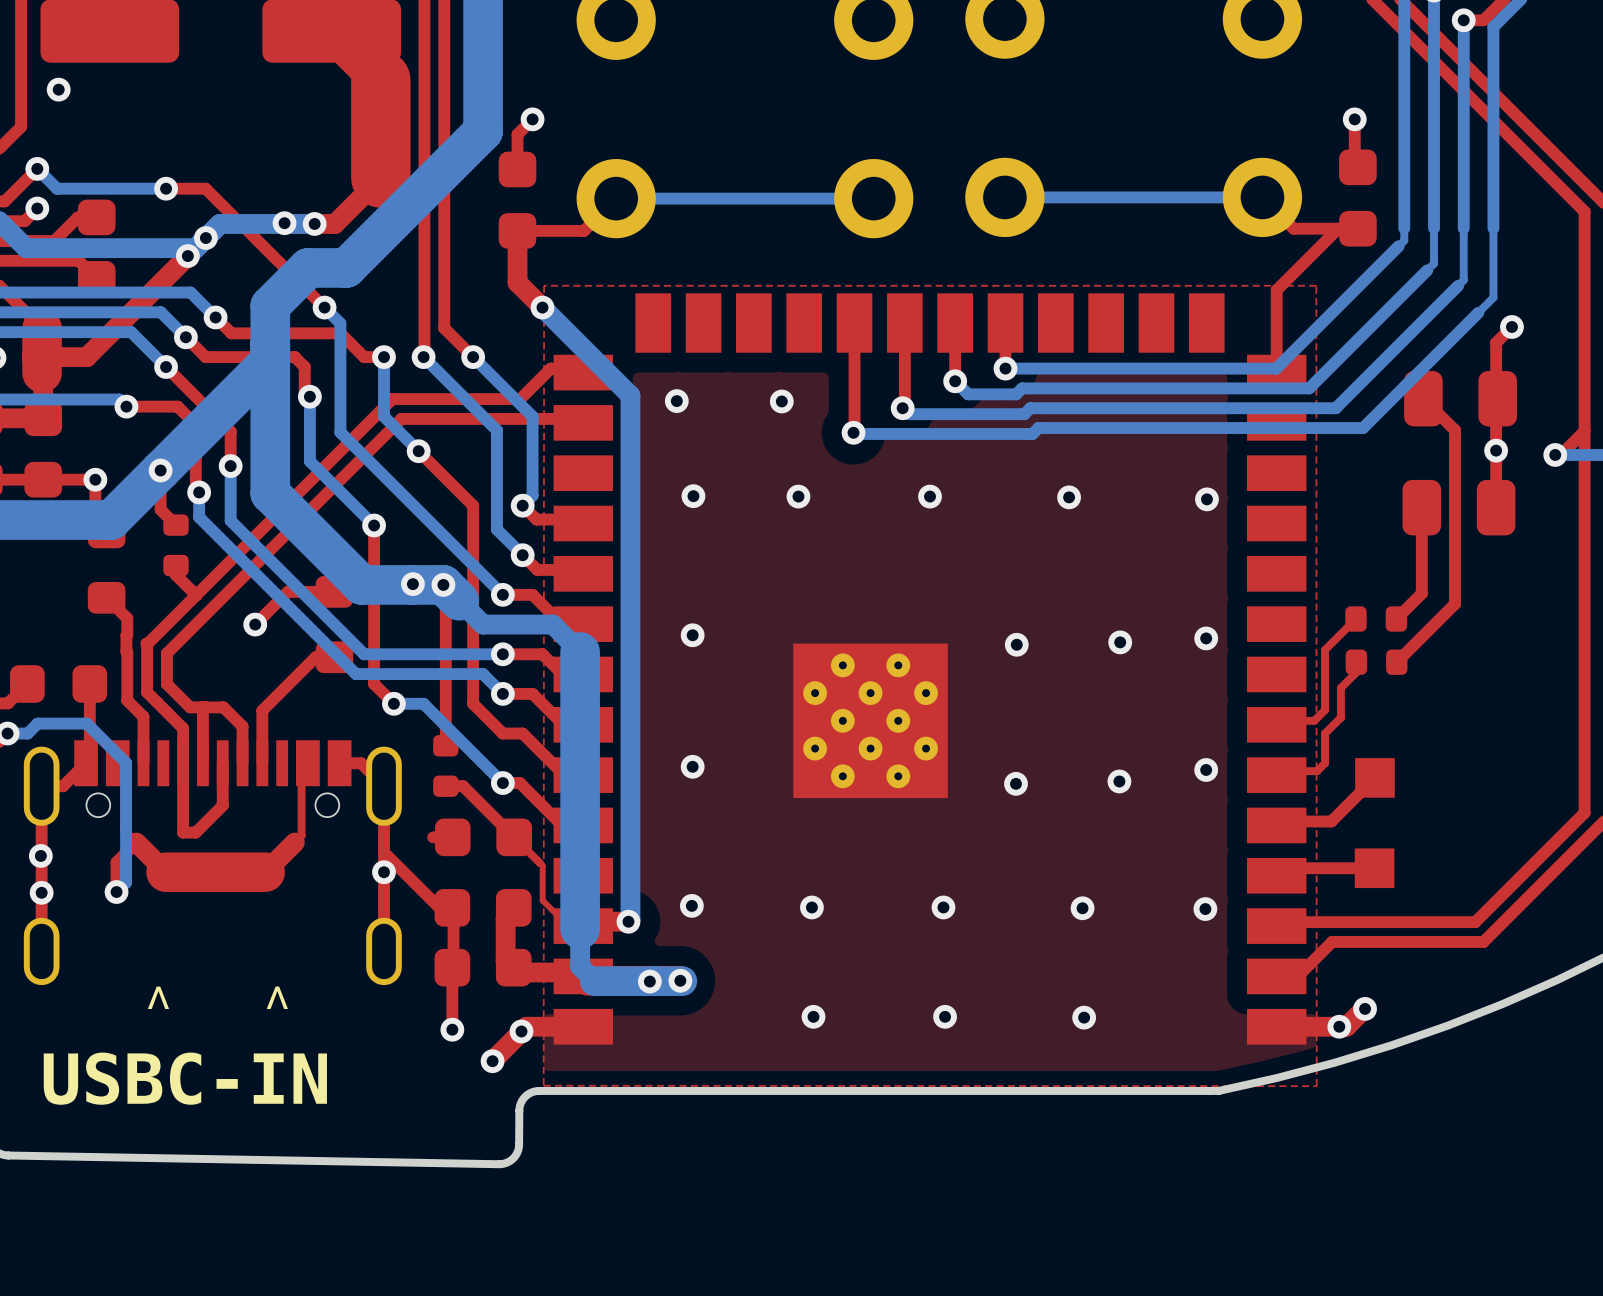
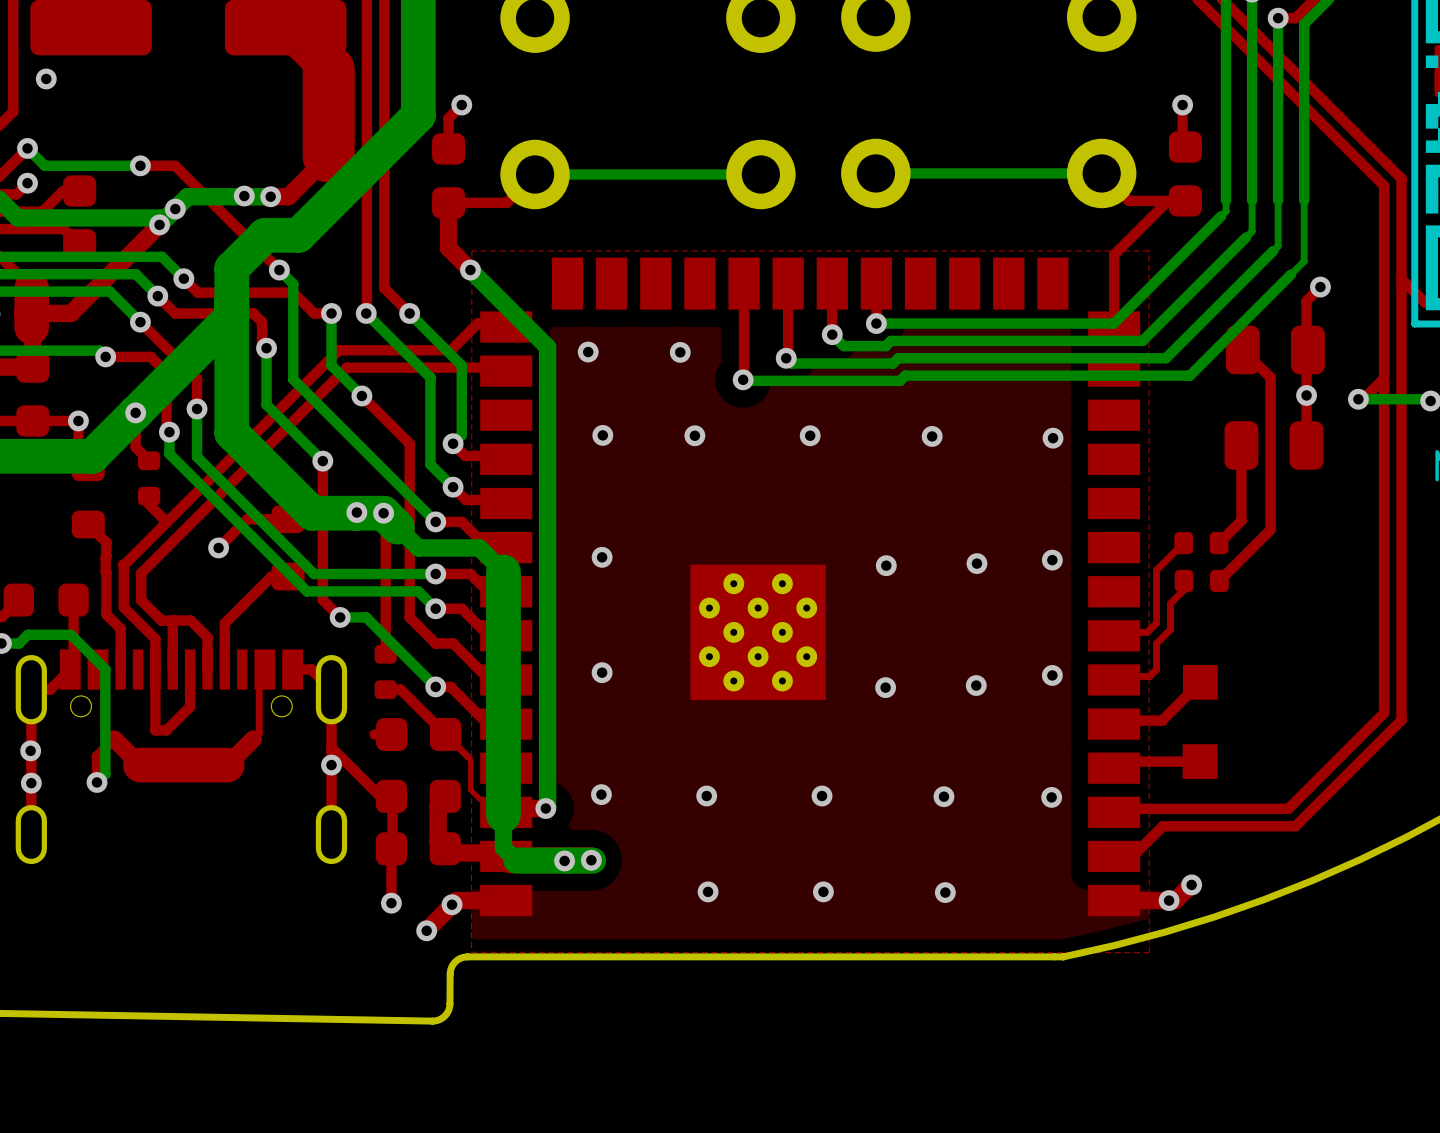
text: > (158, 997) -> none
text: > (277, 997) -> none
text: USBC-IN (185, 1078) -> none

